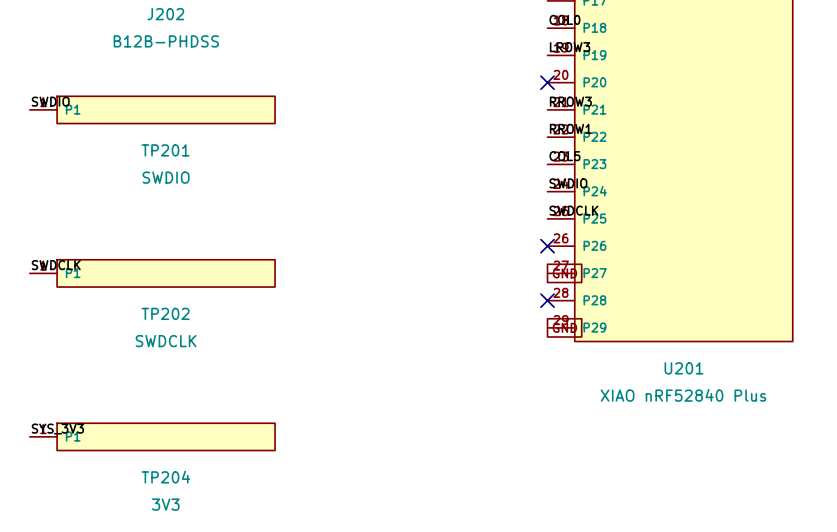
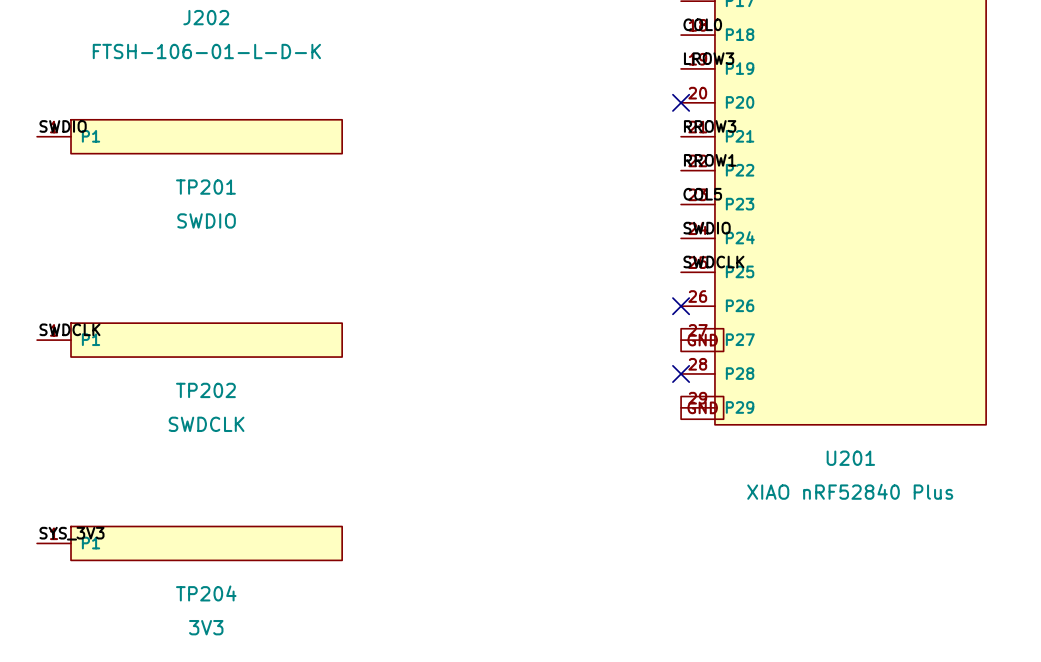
J202 value: B12B-PHDSS (166, 41) -> FTSH-106-01-L-D-K (206, 51)

